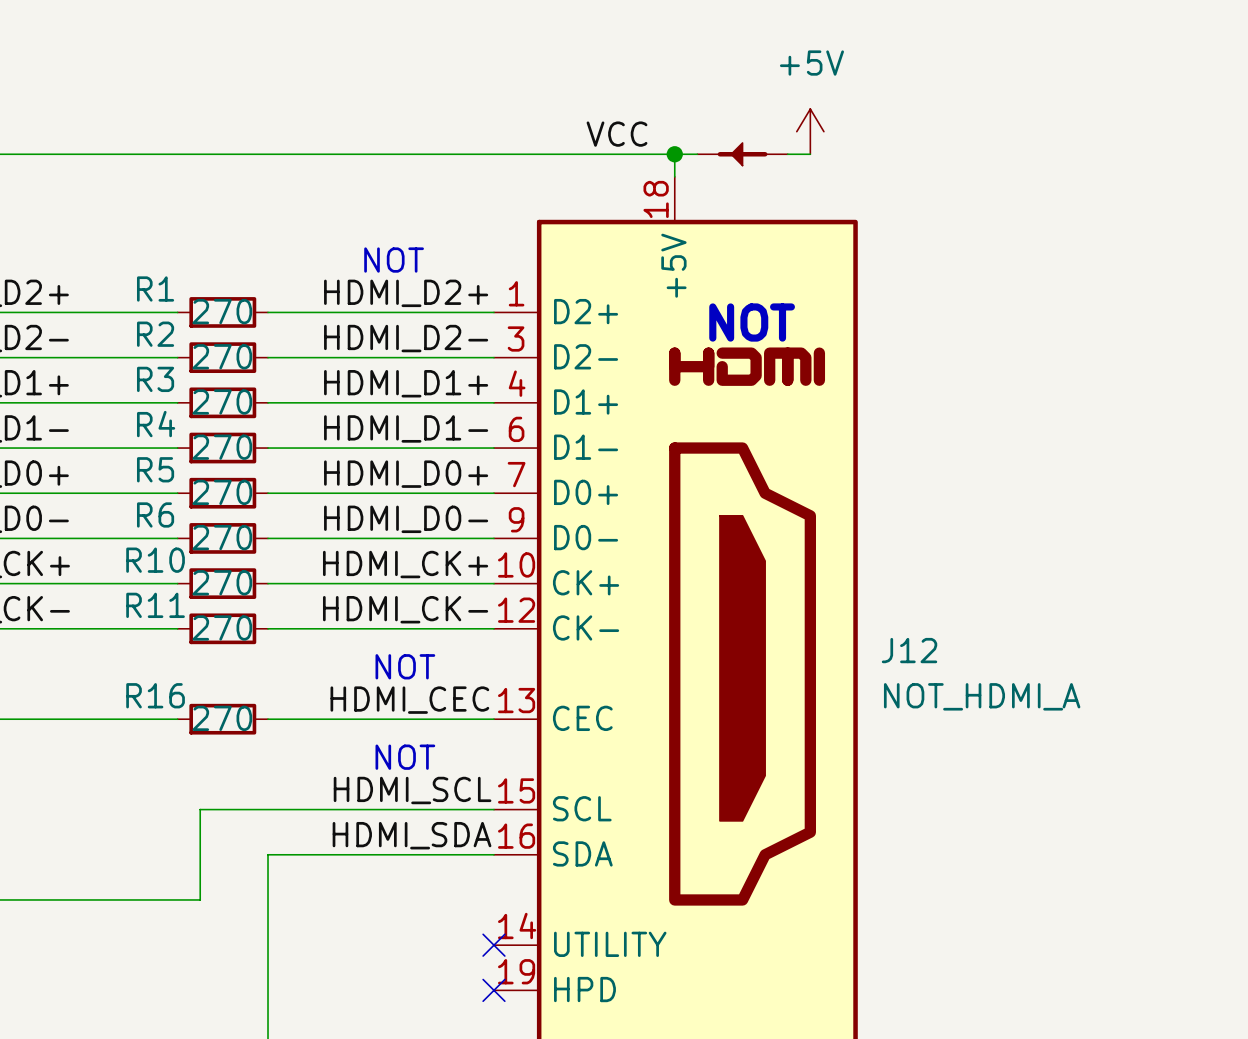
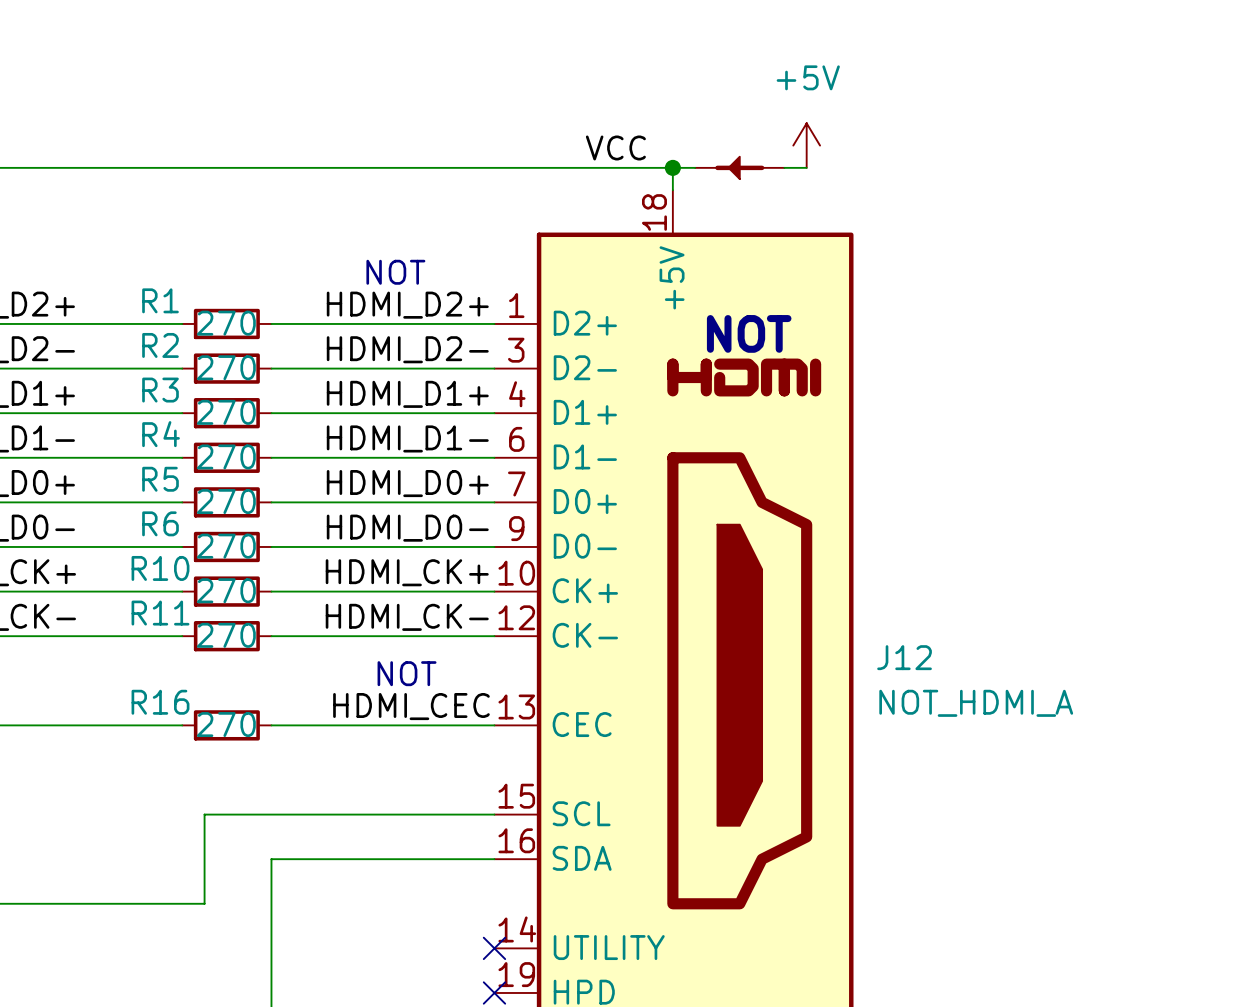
text: NOT (405, 757) -> none
label: HDMI_SCL (412, 790) -> none
label: HDMI_SDA (412, 835) -> none

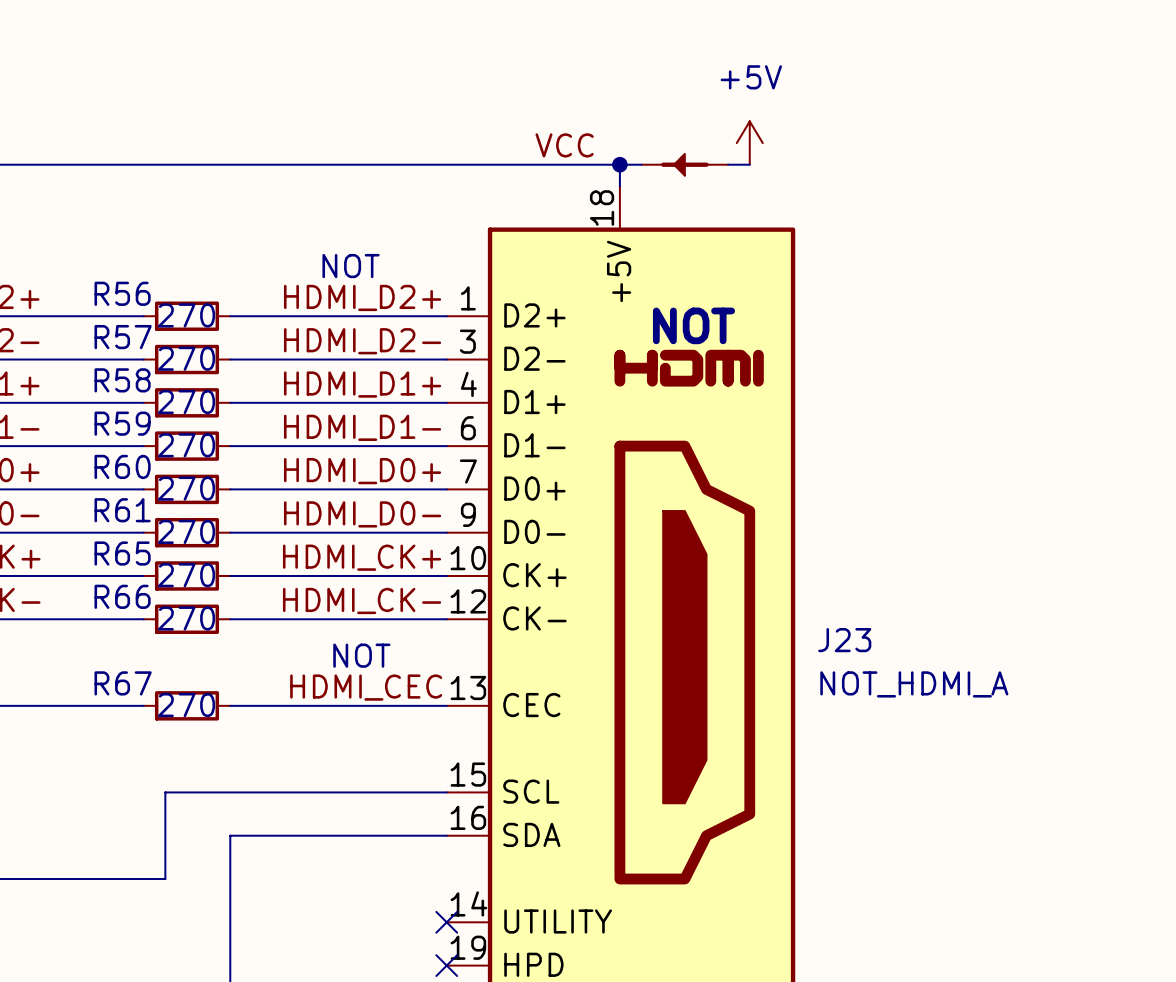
R1 name: R1 (160, 300) -> R56 (122, 293)
R2 name: R2 (160, 345) -> R57 (123, 337)
R3 name: R3 (160, 390) -> R58 (122, 380)
R4 name: R4 (161, 434) -> R59 (122, 423)
R5 name: R5 (160, 479) -> R60 (122, 466)
R6 name: R6 (160, 523) -> R61 (122, 510)
R10 name: R10 (160, 568) -> R65 (122, 553)
R11 name: R11 (160, 613) -> R66 (122, 596)
J12 name: J12 (904, 657) -> J23 (844, 640)
R16 name: R16 (160, 702) -> R67 (123, 683)

